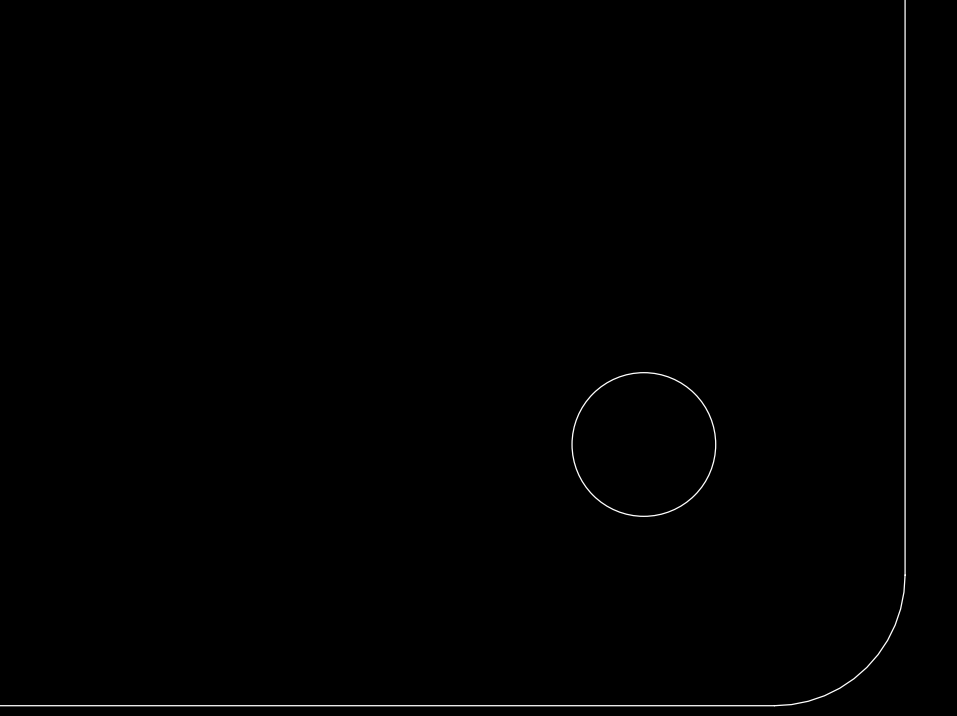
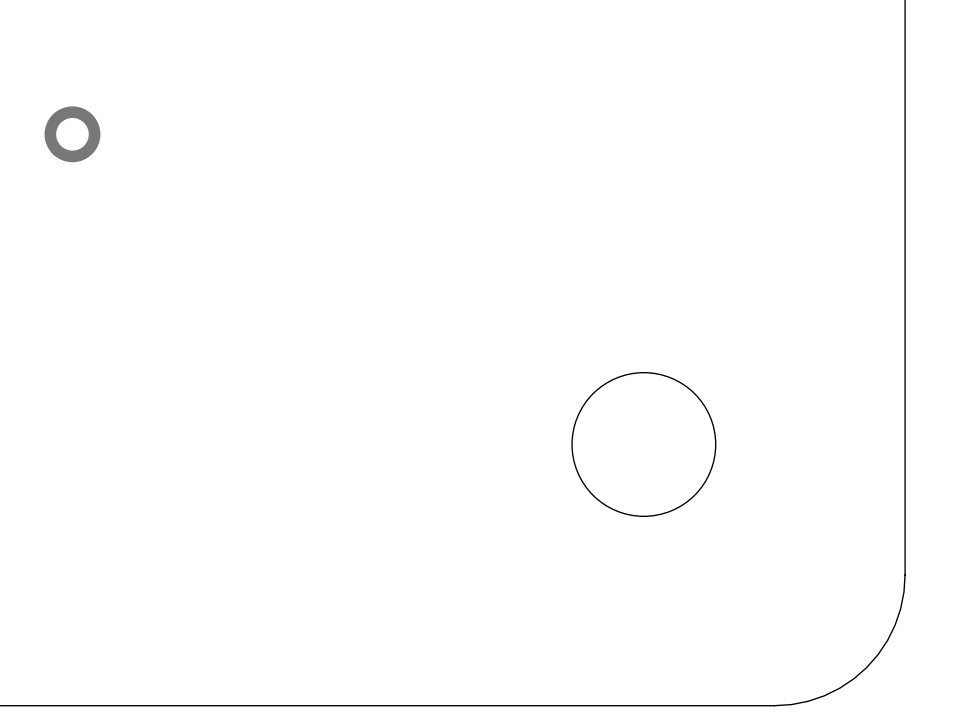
via: none -> (72, 134)

